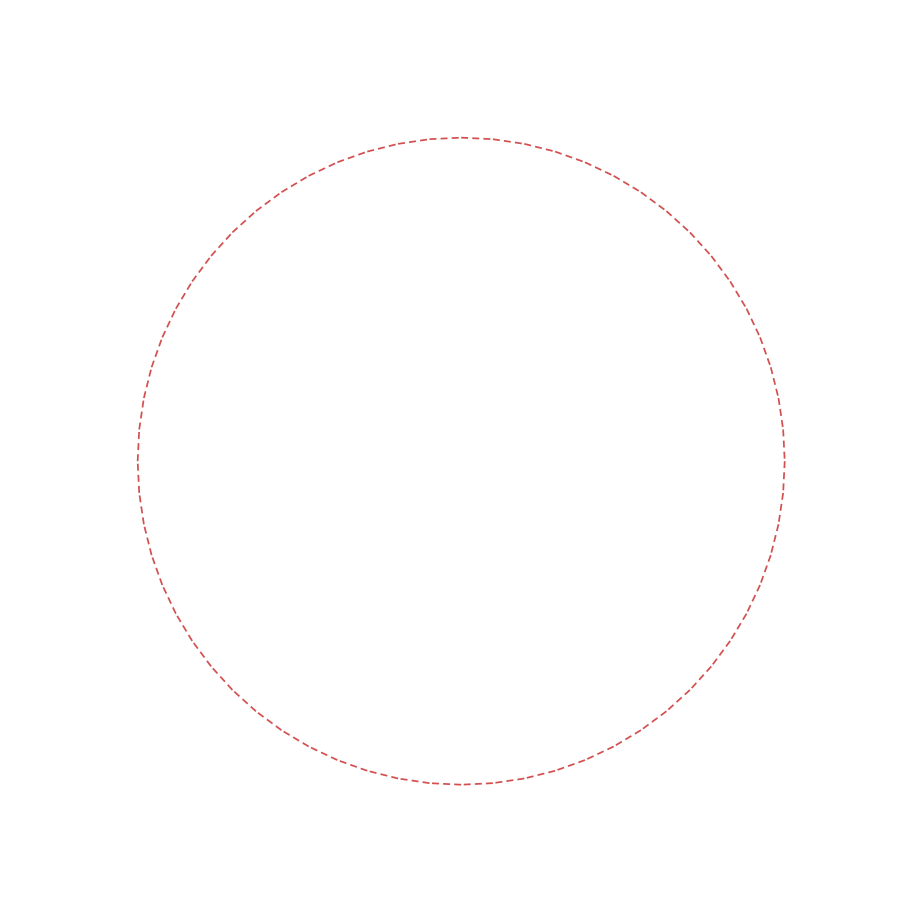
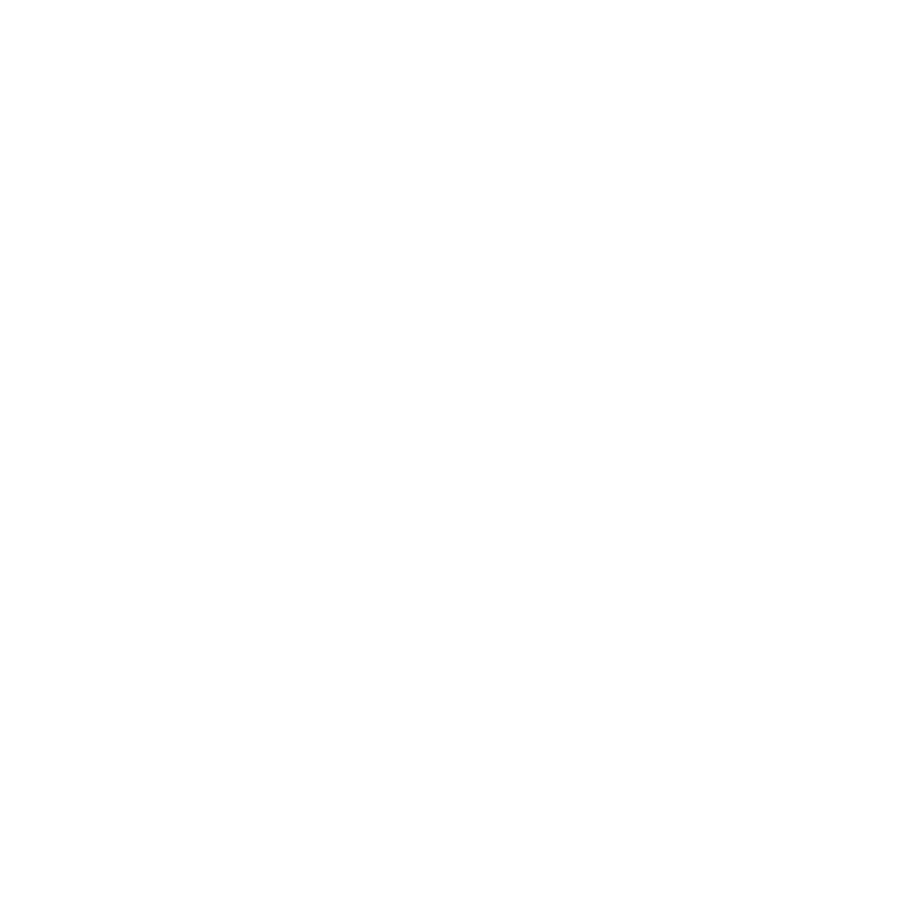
zone outline: (461, 137) (429, 139) (398, 143) (367, 151) (337, 162) (308, 175) (281, 192) (255, 211) (232, 232) (211, 255) (192, 281) (175, 308) (162, 337) (151, 367) (143, 398) (139, 429) (137, 461) (139, 492) (143, 524) (151, 555) (162, 584) (175, 613) (192, 640) (211, 666) (232, 689) (255, 711) (281, 730) (308, 746) (337, 760) (367, 770) (398, 778) (429, 783) (461, 784) (492, 783) (524, 778) (555, 770) (584, 760) (613, 746) (640, 730) (666, 711) (689, 689) (711, 666) (730, 640) (746, 613) (760, 584) (770, 555) (778, 524) (783, 492) (784, 461) (783, 429) (778, 398) (770, 367) (760, 337) (746, 308) (730, 281) (711, 255) (689, 232) (666, 211) (640, 192) (613, 175) (584, 162) (555, 151) (524, 143) (492, 139) (461, 137) -> none

